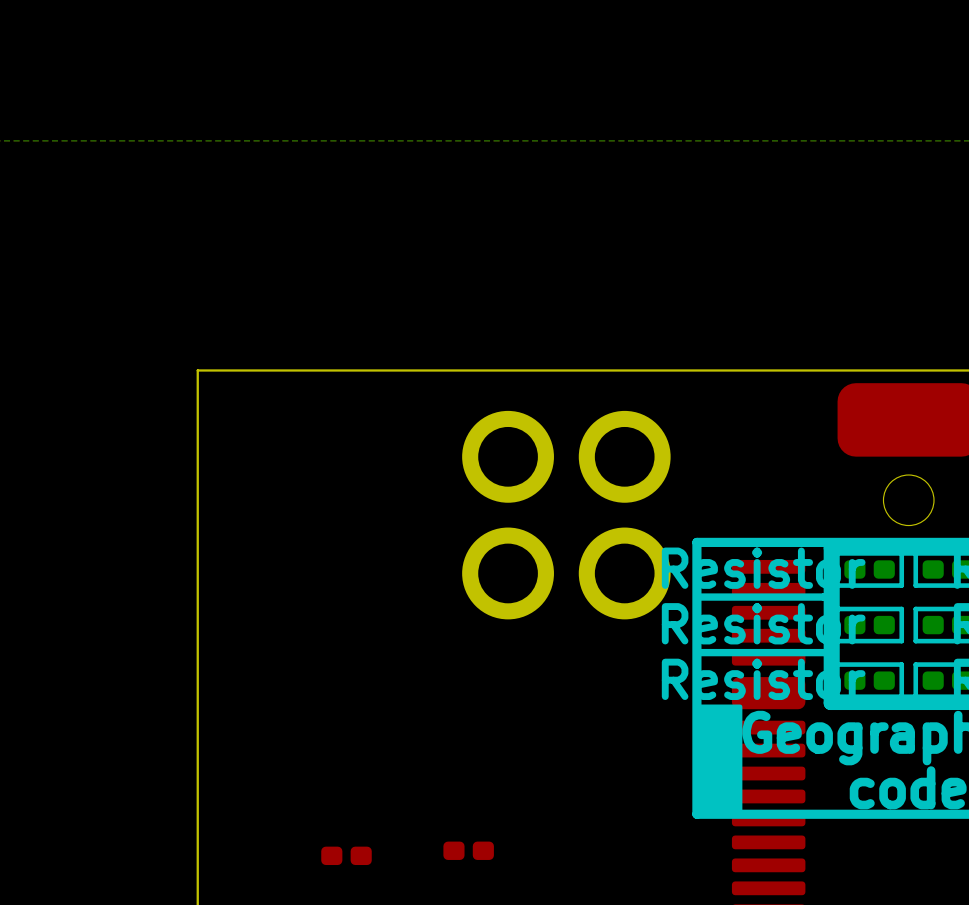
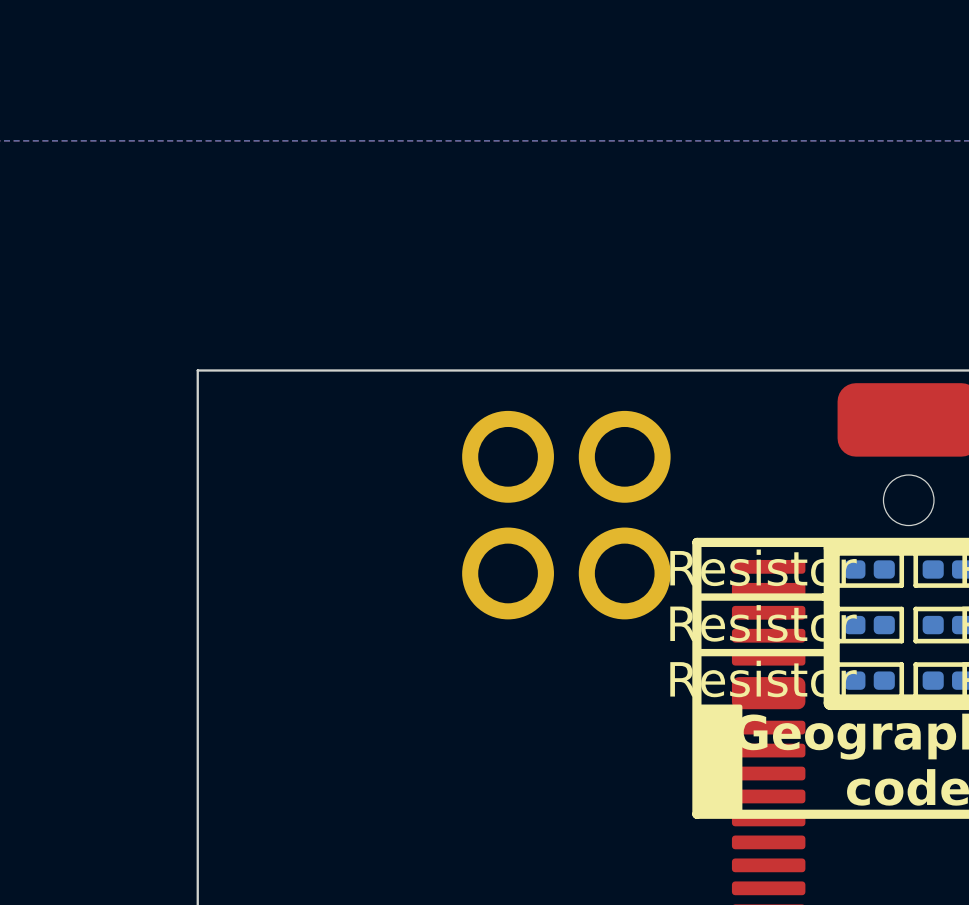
part: (468, 850) -> none
part: (346, 855) -> none

